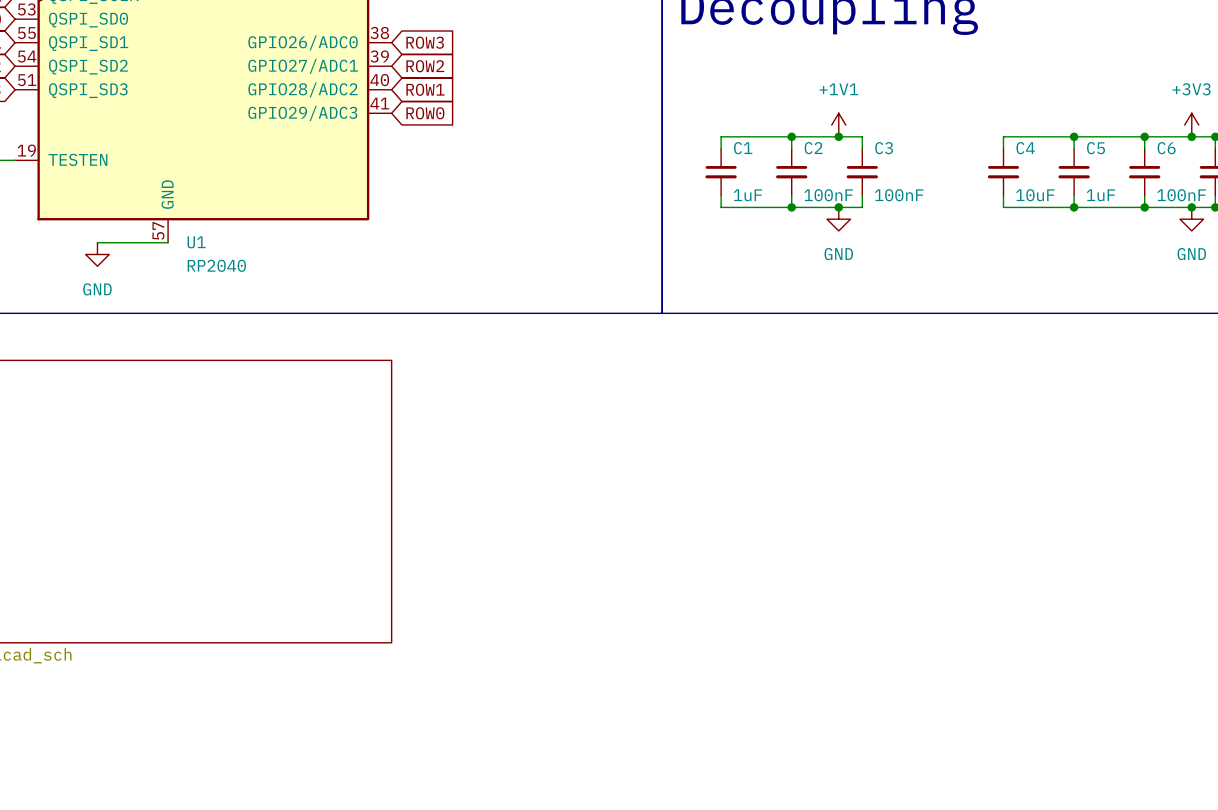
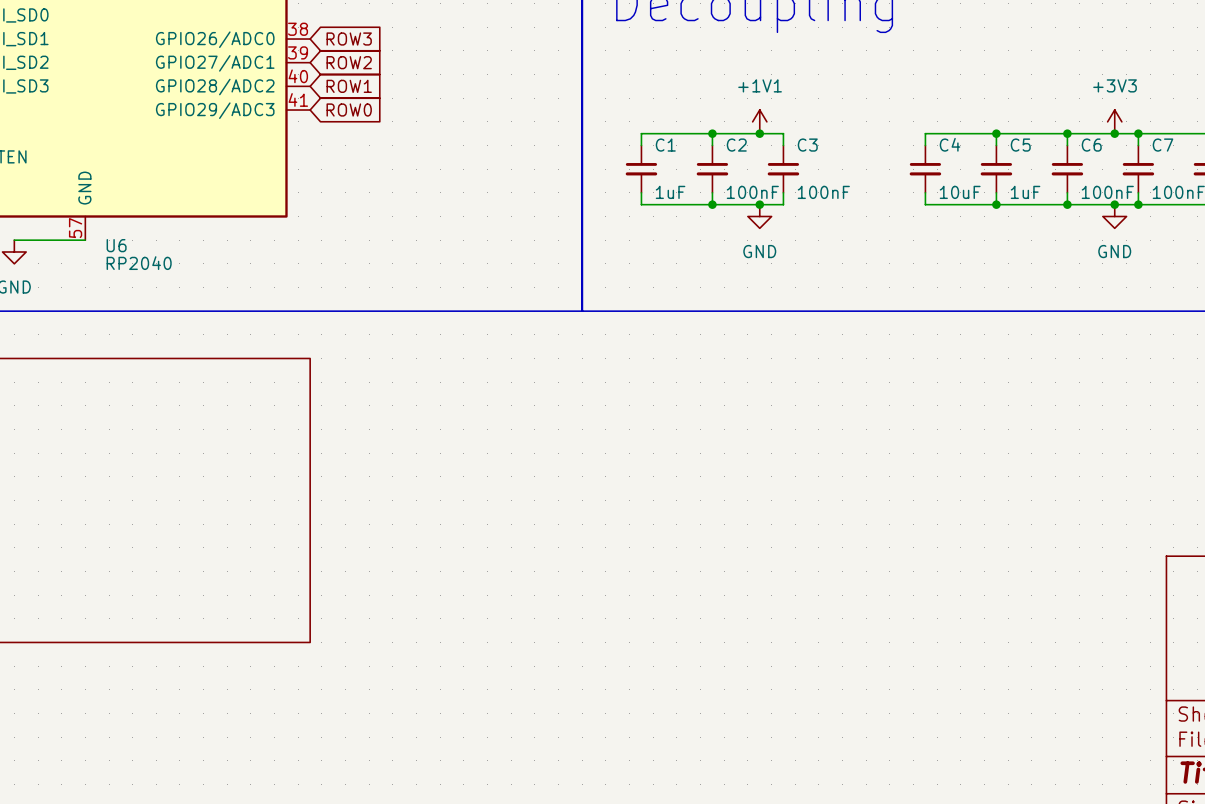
U1 name: U1 (196, 242) -> U6 (116, 245)

